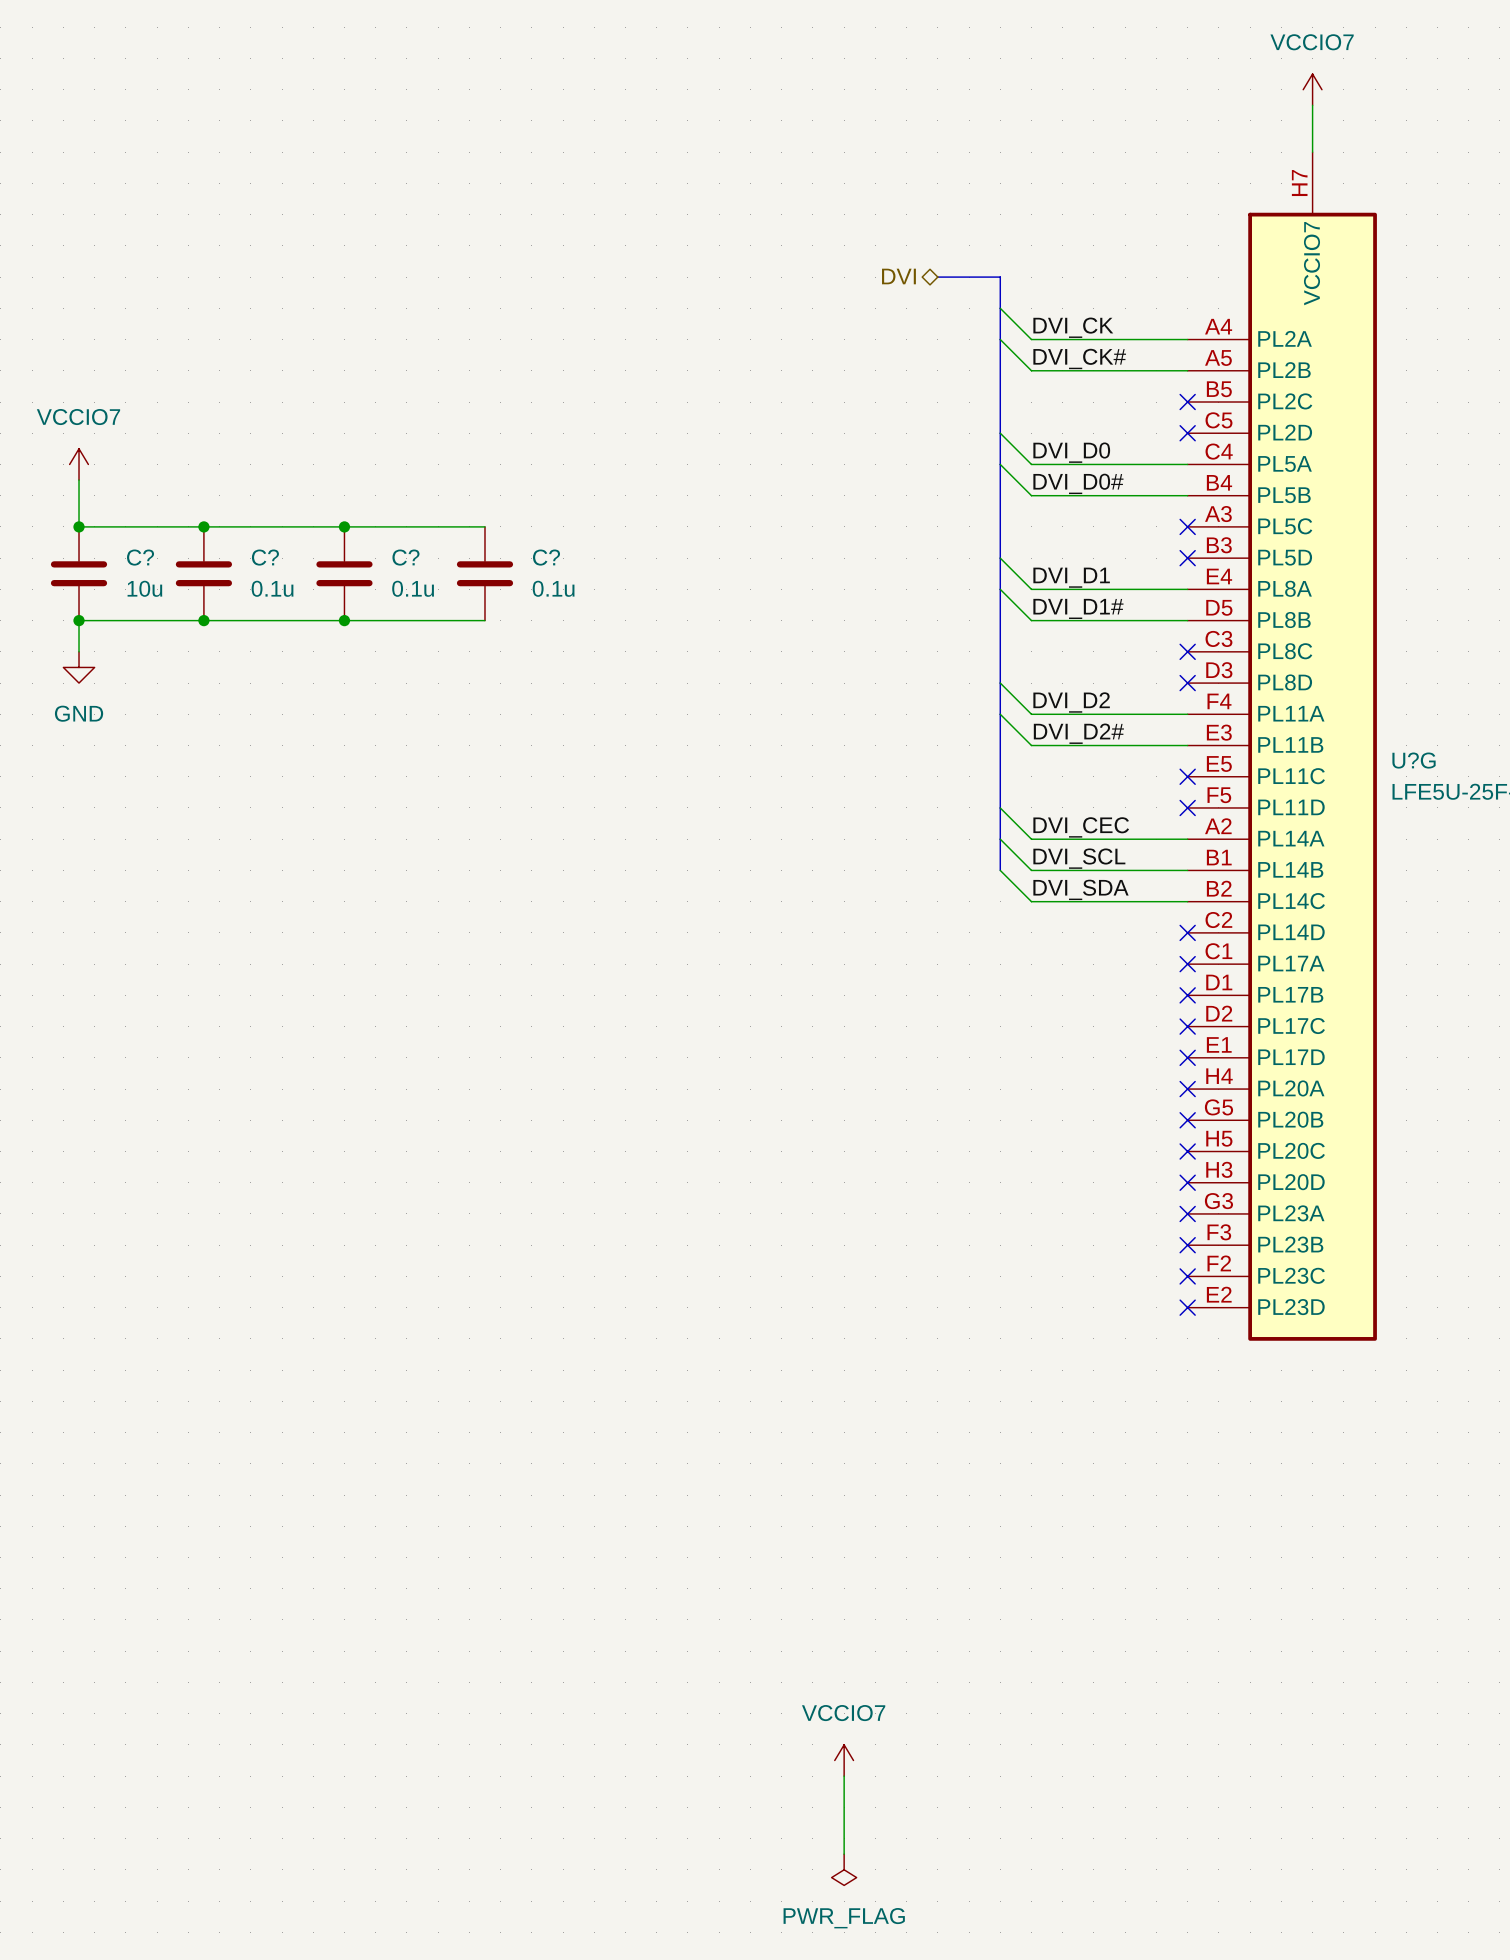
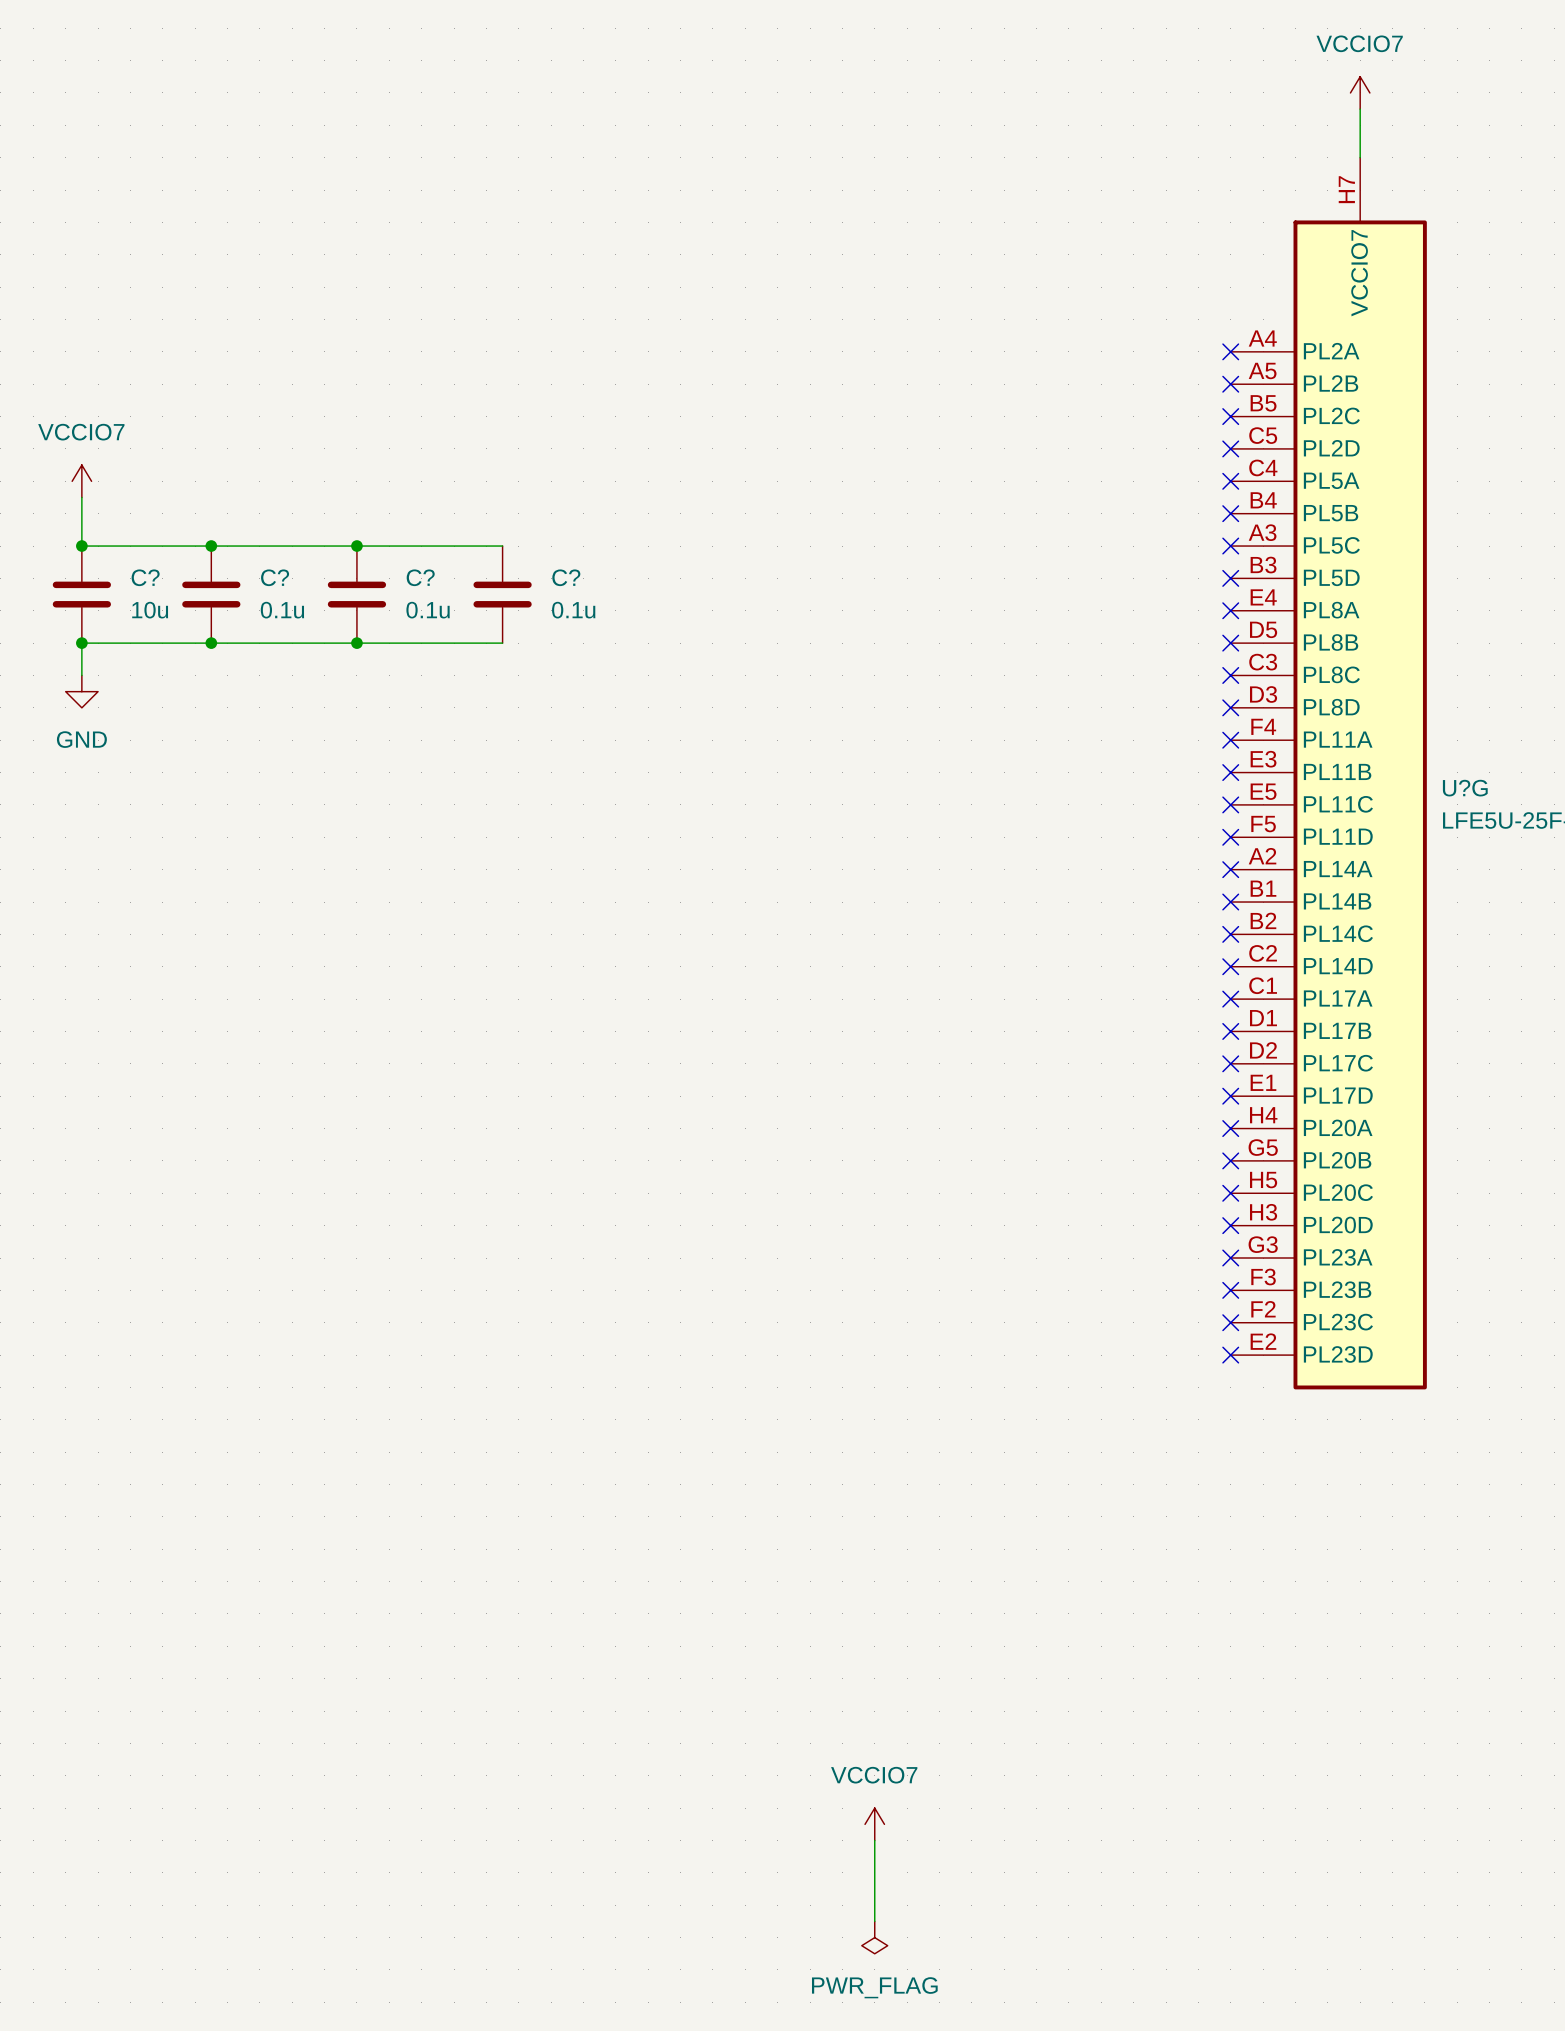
hierarchical label: DVI (898, 276) -> none
bus: (937, 277) (1000, 277) (1000, 870) -> none
wire: (1000, 308) (1031, 339) (1187, 339) -> none
label: DVI_CK (1073, 327) -> none
wire: (1000, 339) (1031, 370) (1187, 370) -> none
no-connect mark: none -> (1230, 351)
label: DVI_CK# (1079, 358) -> none
no-connect mark: none -> (1230, 384)
wire: (1000, 433) (1031, 464) (1187, 464) -> none
label: DVI_D0 (1071, 452) -> none
wire: (1000, 464) (1031, 495) (1187, 495) -> none
no-connect mark: none -> (1230, 481)
label: DVI_D0# (1078, 483) -> none
no-connect mark: none -> (1230, 513)
wire: (1000, 558) (1031, 589) (1187, 589) -> none
label: DVI_D1 (1071, 577) -> none
wire: (1000, 589) (1031, 620) (1187, 620) -> none
no-connect mark: none -> (1230, 610)
label: DVI_D1# (1078, 608) -> none
no-connect mark: none -> (1230, 643)
wire: (1000, 683) (1031, 714) (1187, 714) -> none
label: DVI_D2 (1071, 702) -> none
wire: (1000, 714) (1031, 745) (1187, 745) -> none
no-connect mark: none -> (1230, 740)
label: DVI_D2# (1078, 733) -> none
no-connect mark: none -> (1230, 772)
wire: (1000, 807) (1031, 839) (1187, 839) -> none
label: DVI_CEC (1081, 827) -> none
wire: (1000, 839) (1031, 870) (1187, 870) -> none
no-connect mark: none -> (1230, 869)
label: DVI_SCL (1079, 858) -> none
wire: (1000, 870) (1031, 901) (1187, 901) -> none
no-connect mark: none -> (1230, 902)
label: DVI_SDA (1080, 889) -> none
no-connect mark: none -> (1230, 934)

